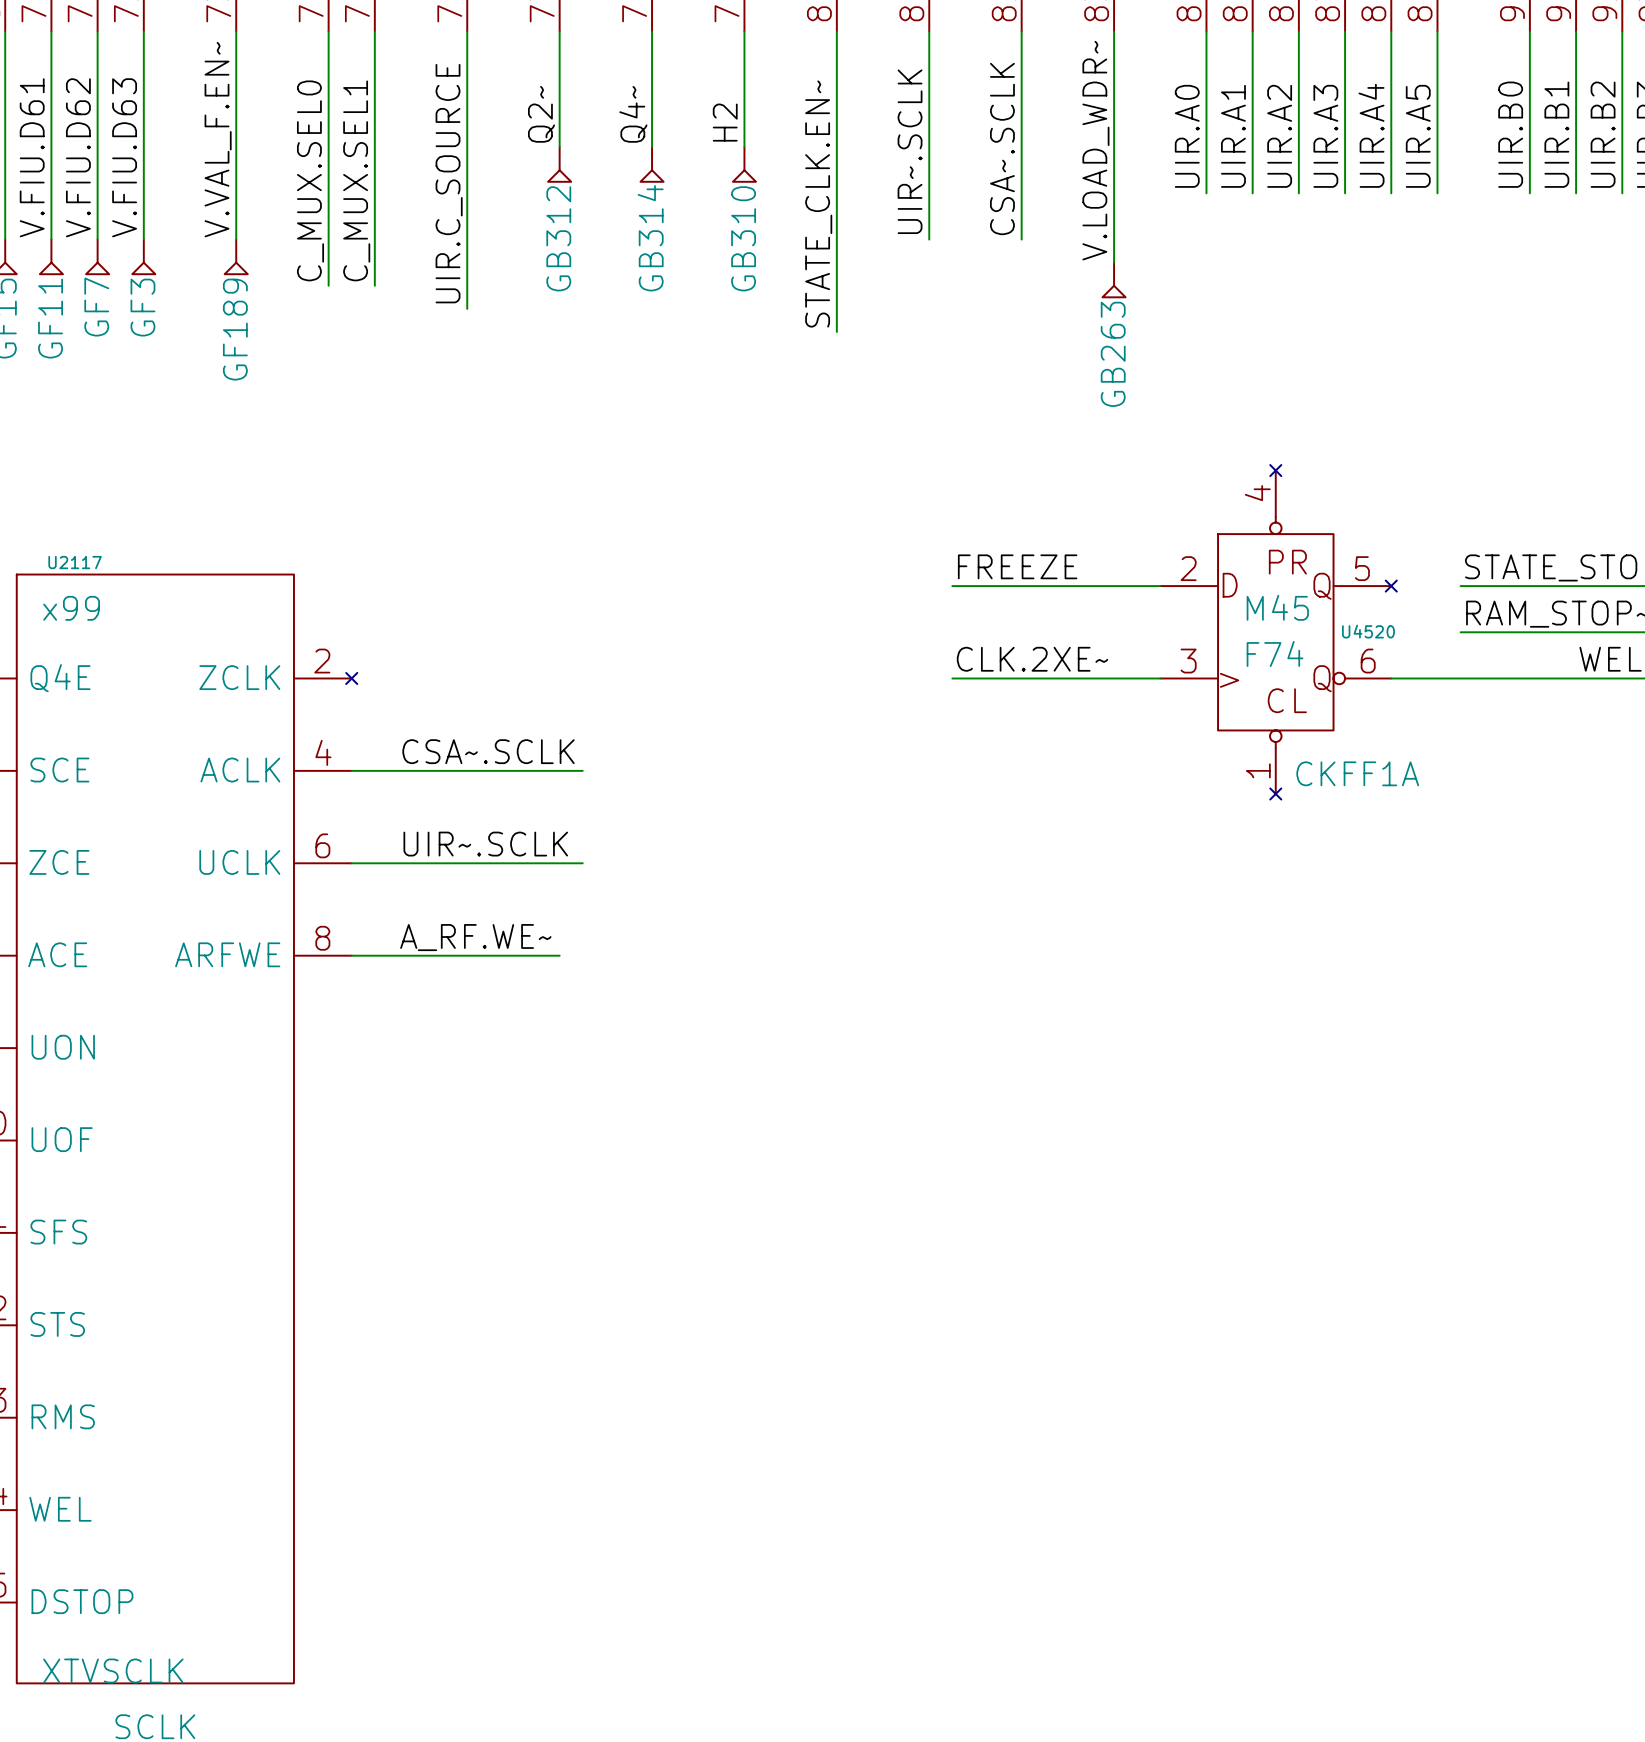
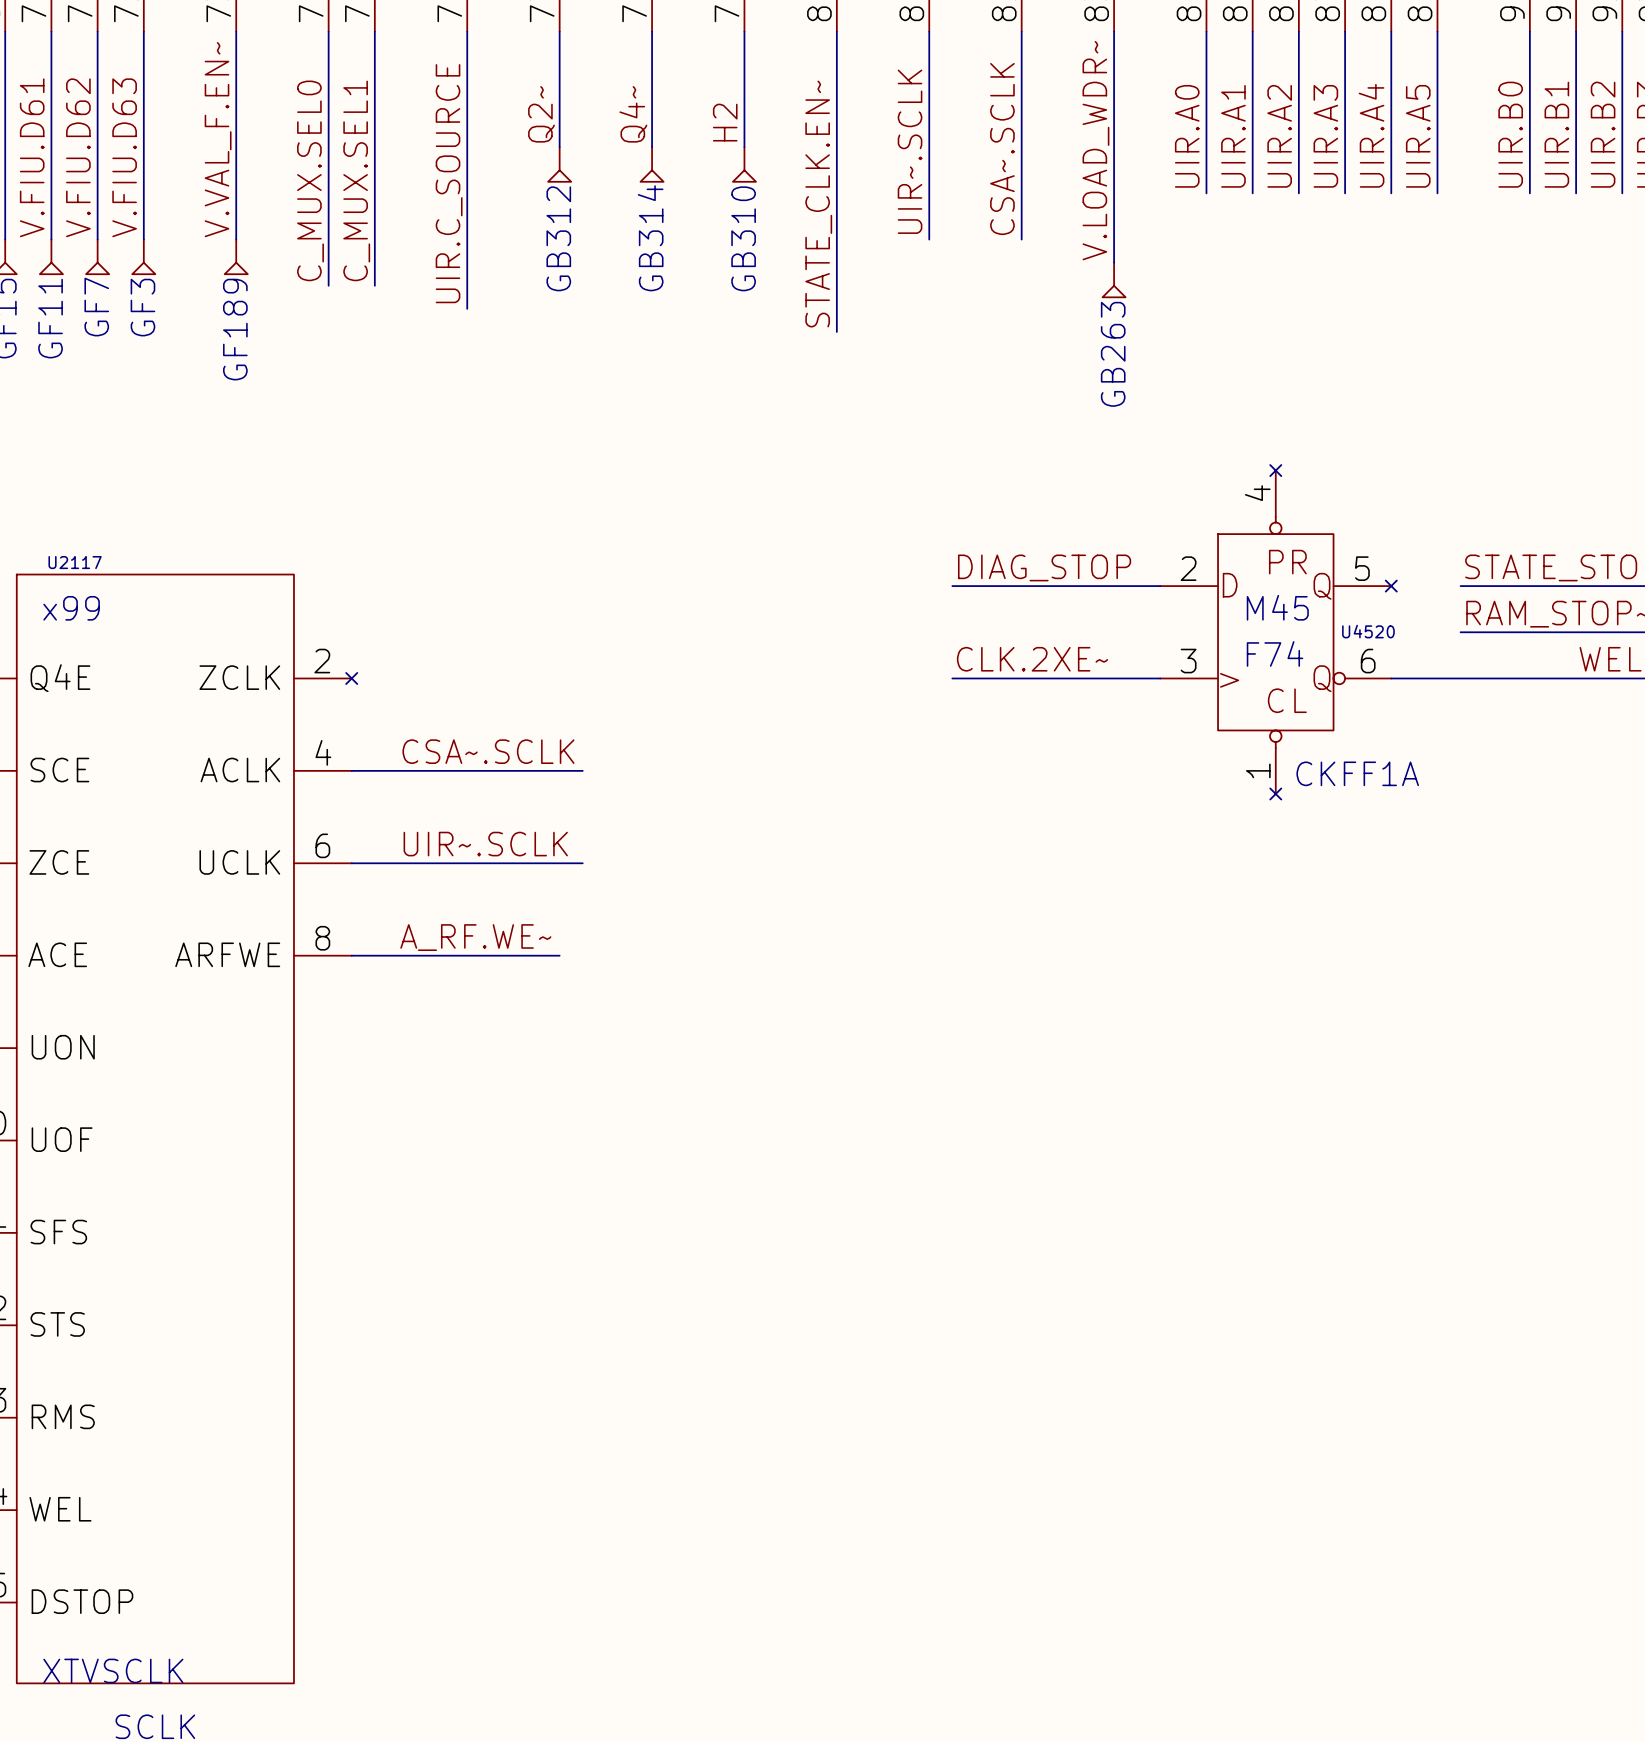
label: FREEZE (1017, 566) -> DIAG_STOP (1044, 567)

